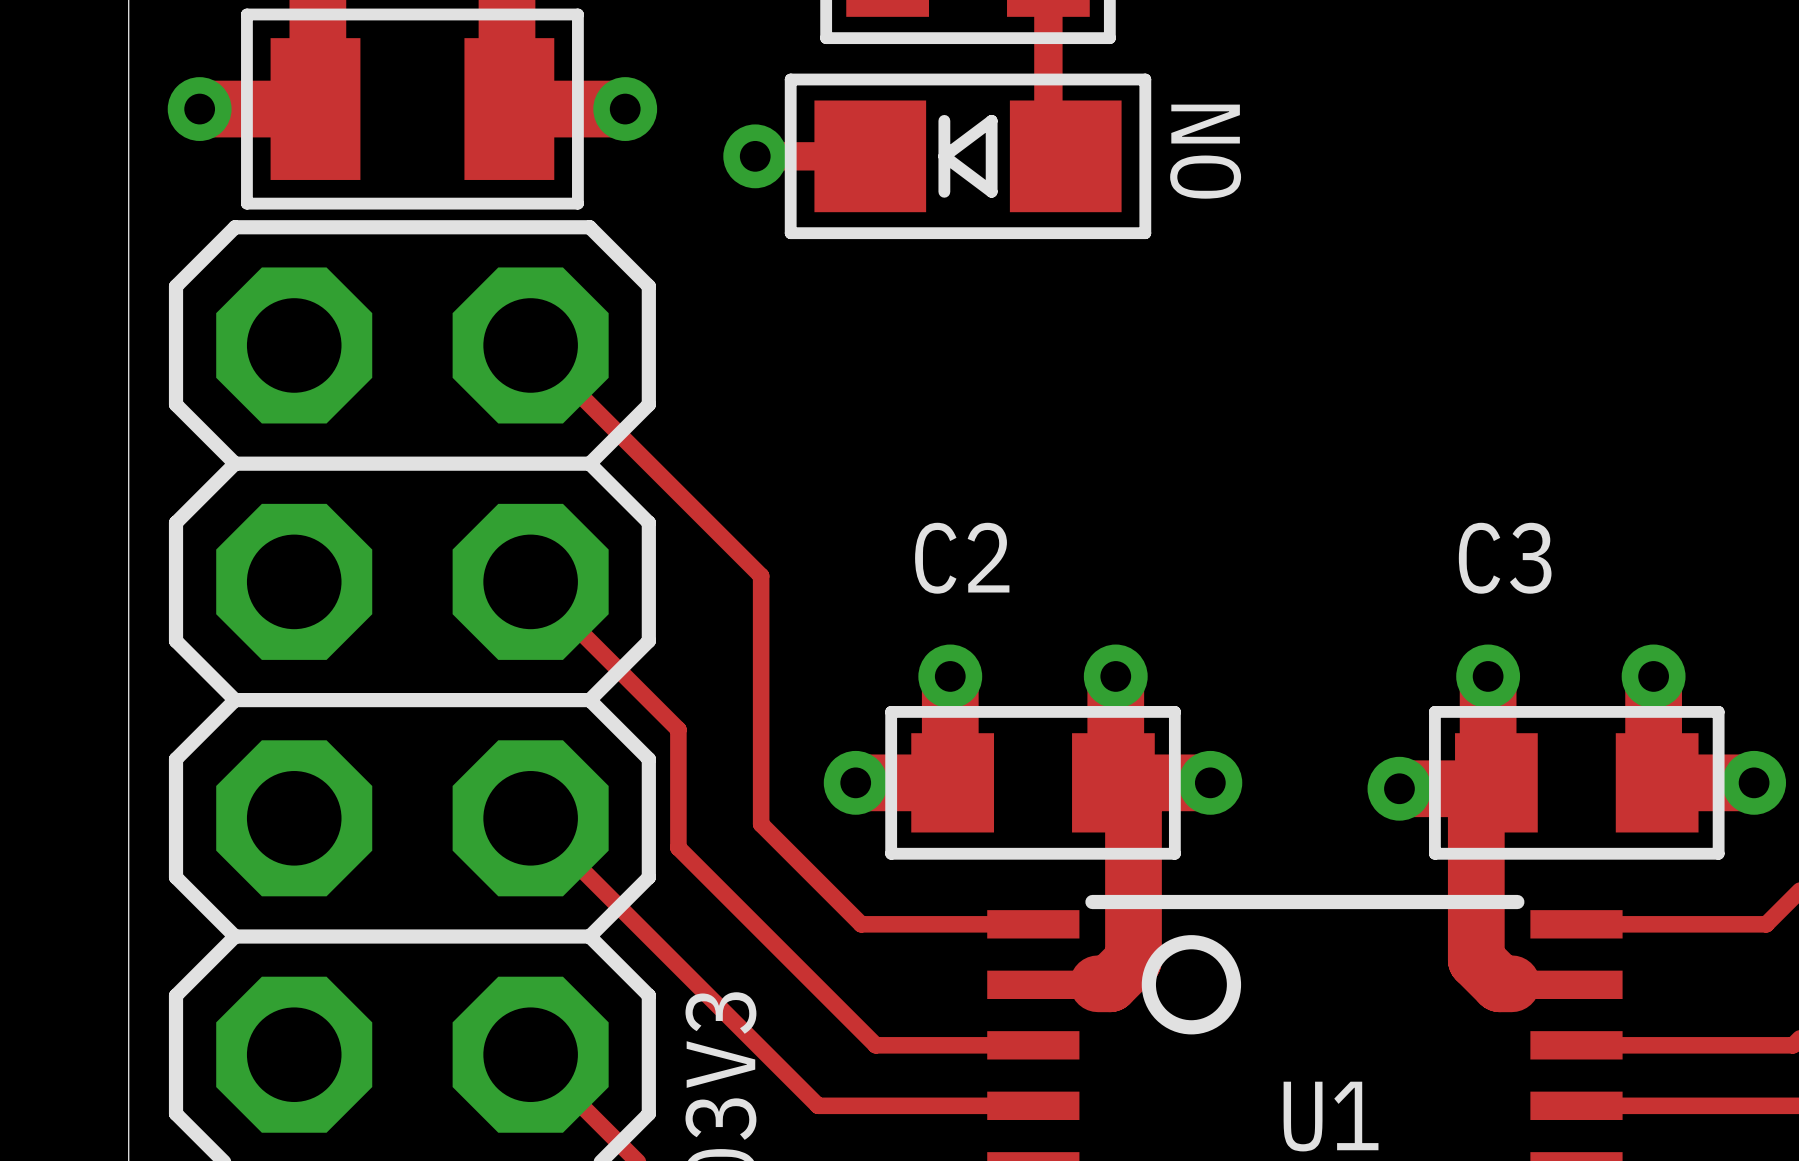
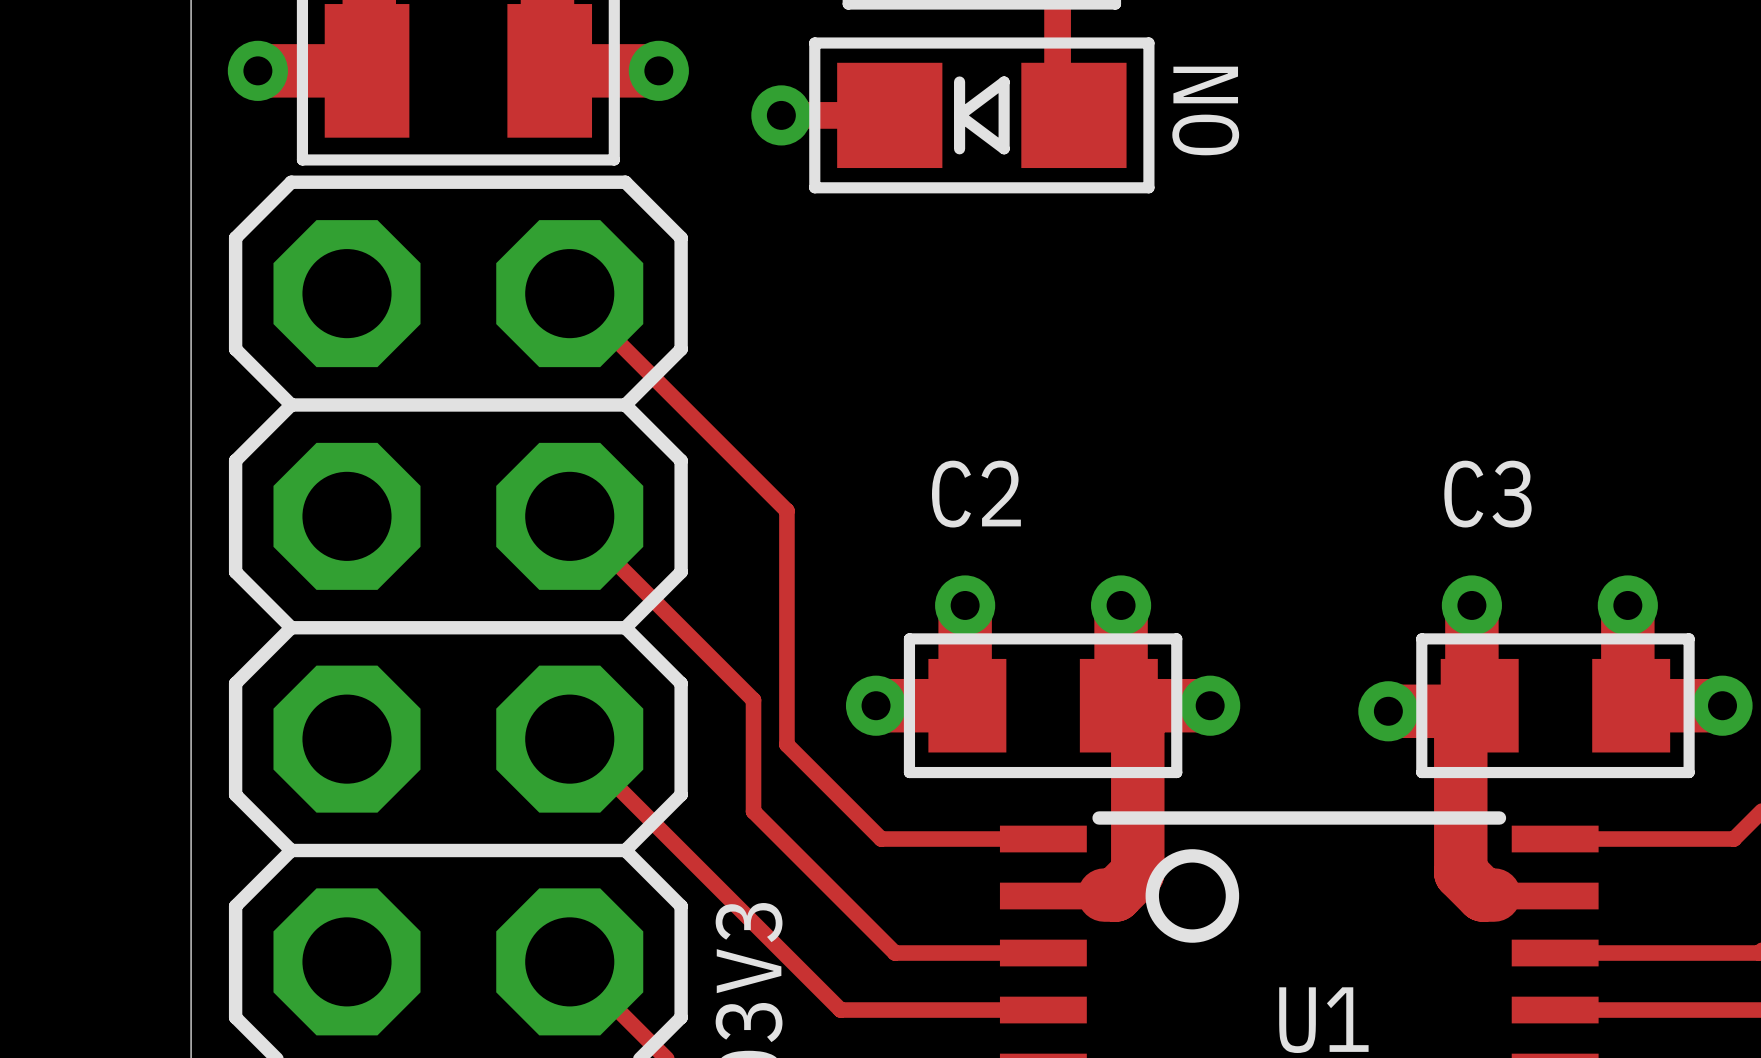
top track: (678, 729) (678, 847) (725, 895) -> (708, 655) (753, 700) (753, 811)

